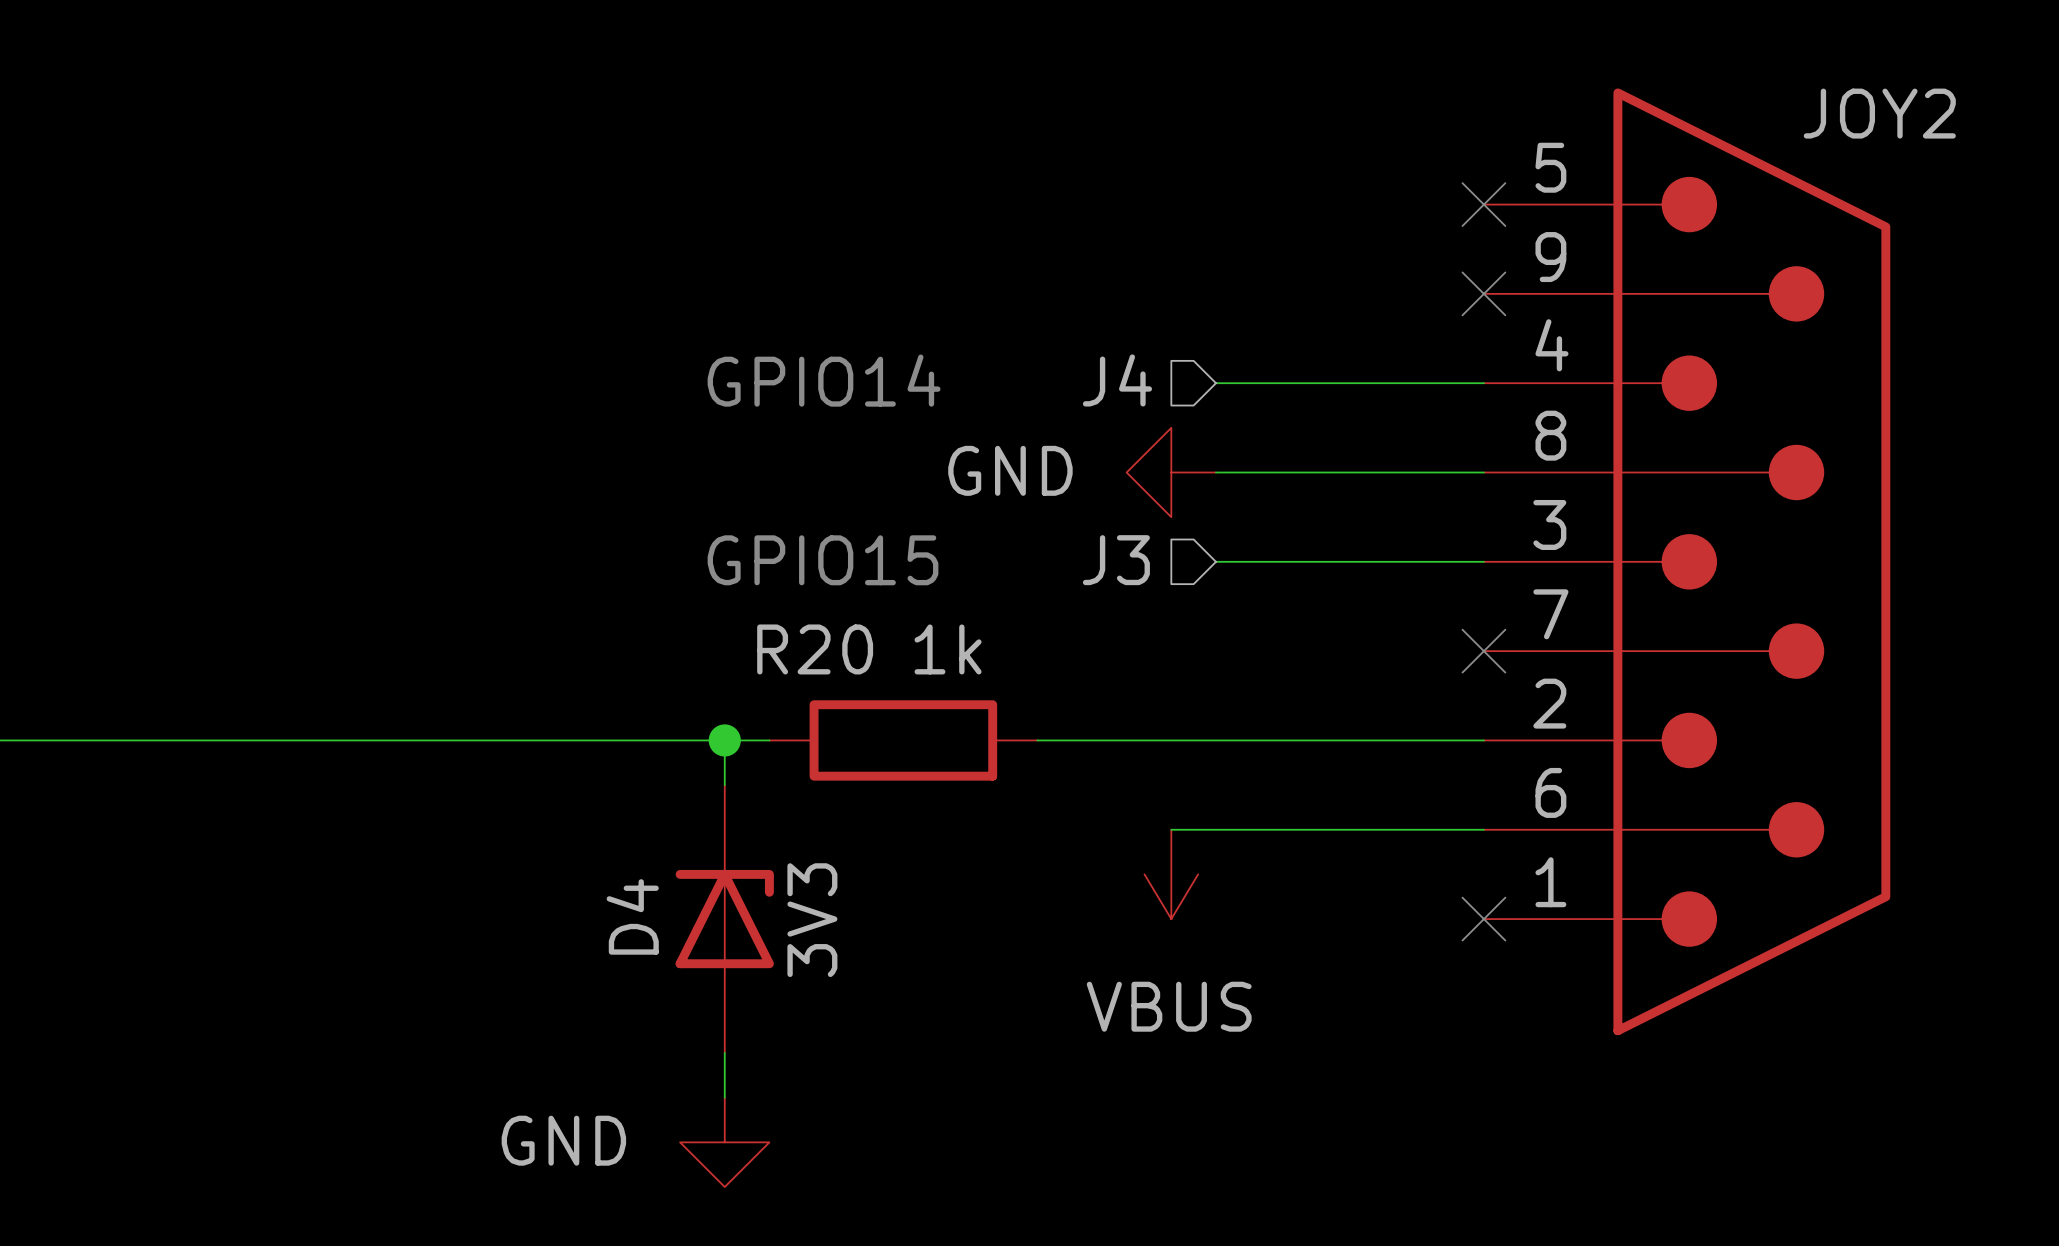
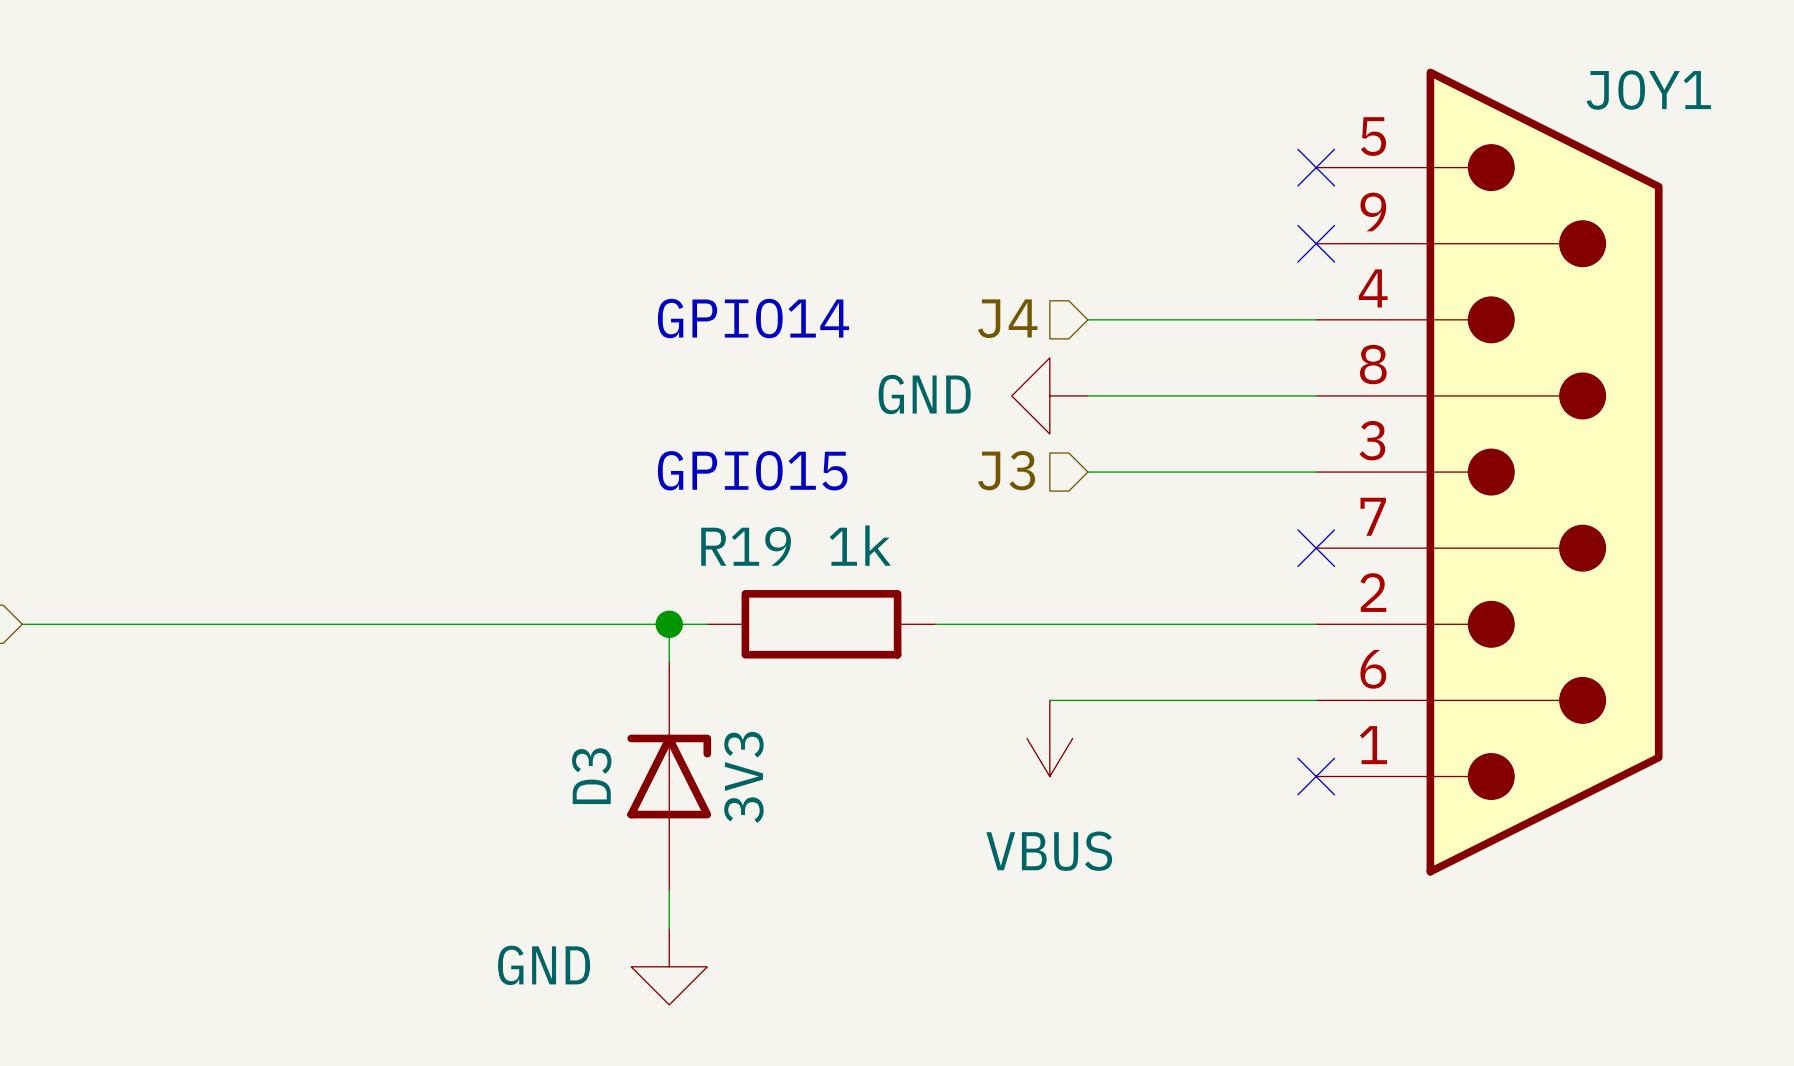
JOY2 name: JOY2 (1879, 113) -> JOY1 (1648, 90)
R20 name: R20 (815, 649) -> R19 (746, 546)
D4 name: D4 (632, 916) -> D3 (591, 776)

